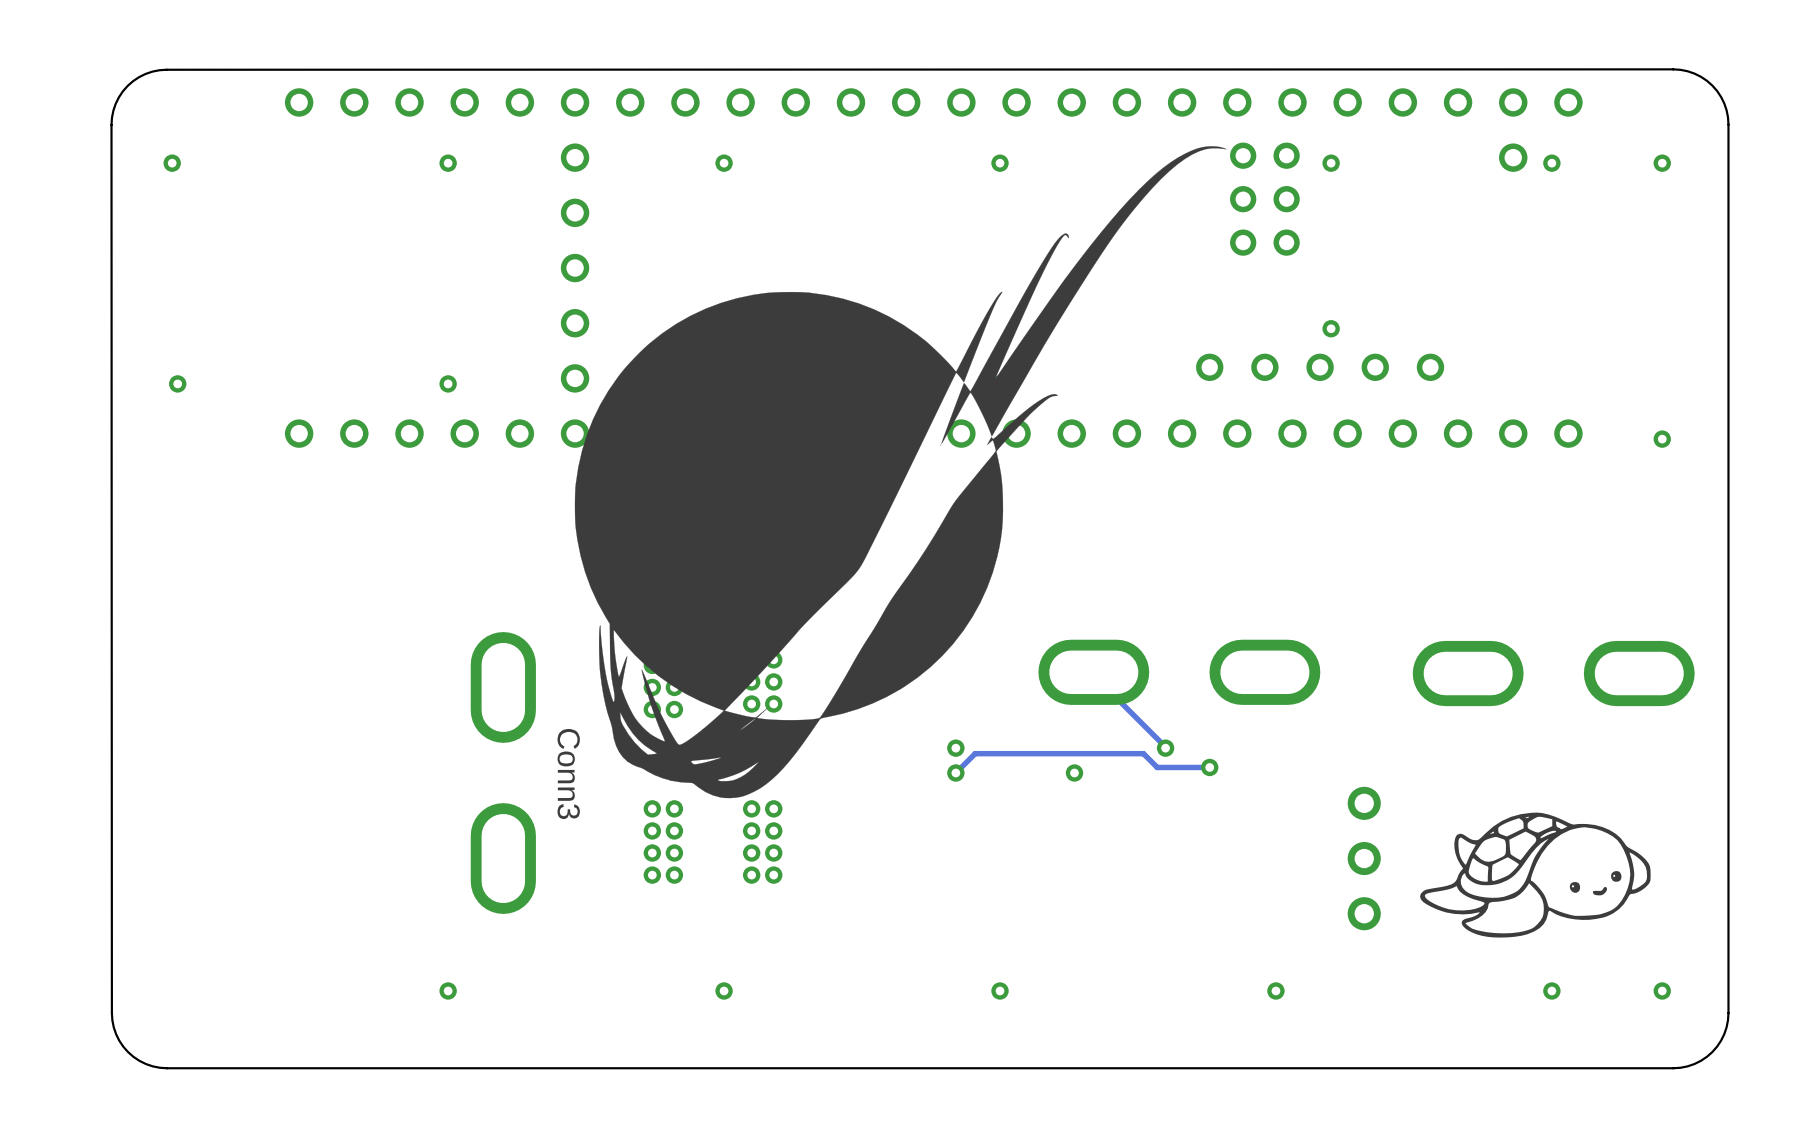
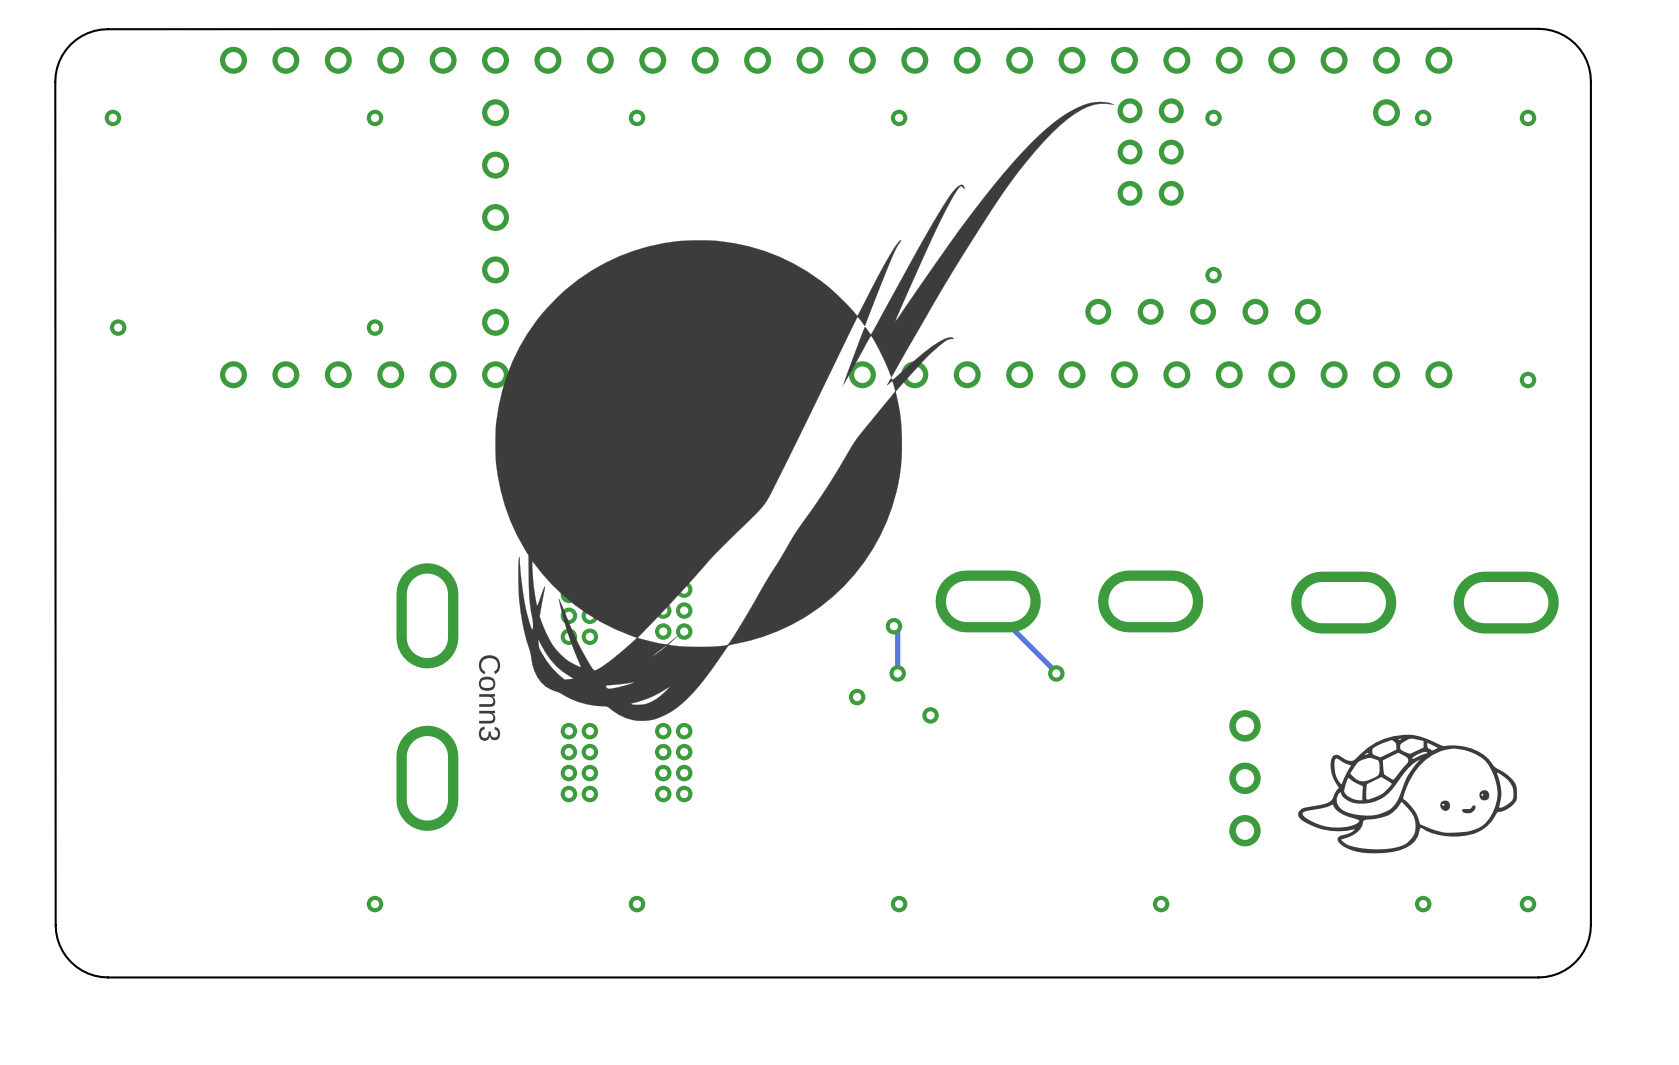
track: none -> (893, 626) (897, 629) (897, 673)
via: none -> (893, 626)
via: (955, 748) -> none
via: none -> (897, 673)
track: (1209, 767) (1157, 767) (1143, 753) (975, 753) (955, 772) -> none
via: (1209, 767) -> none
via: (1074, 772) -> none
via: none -> (930, 715)

